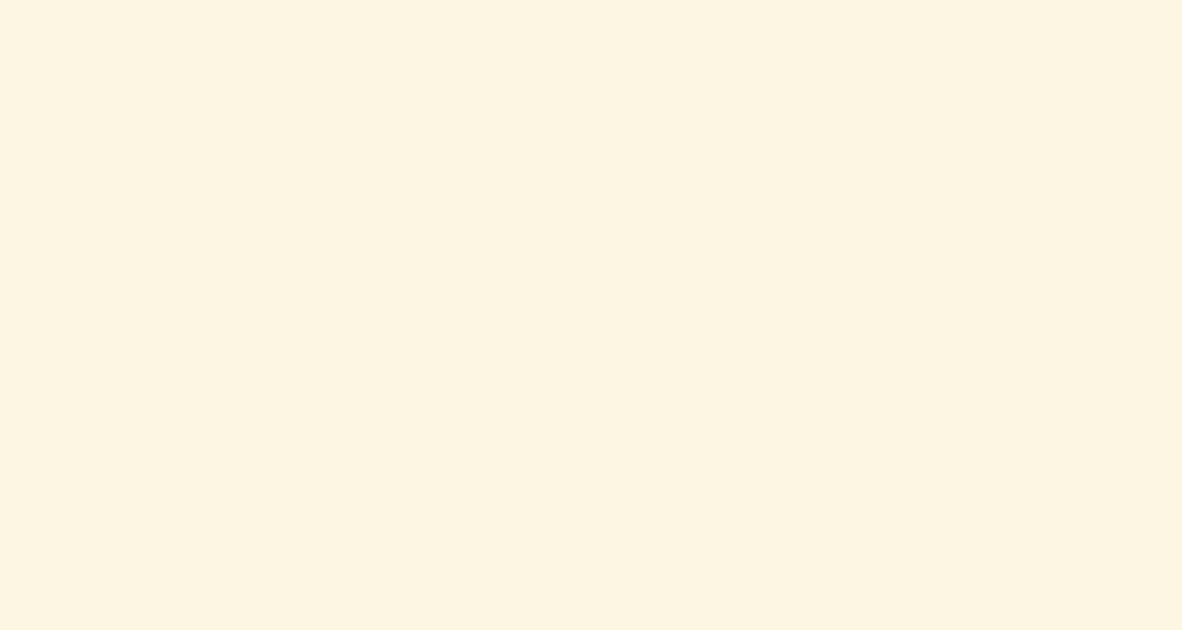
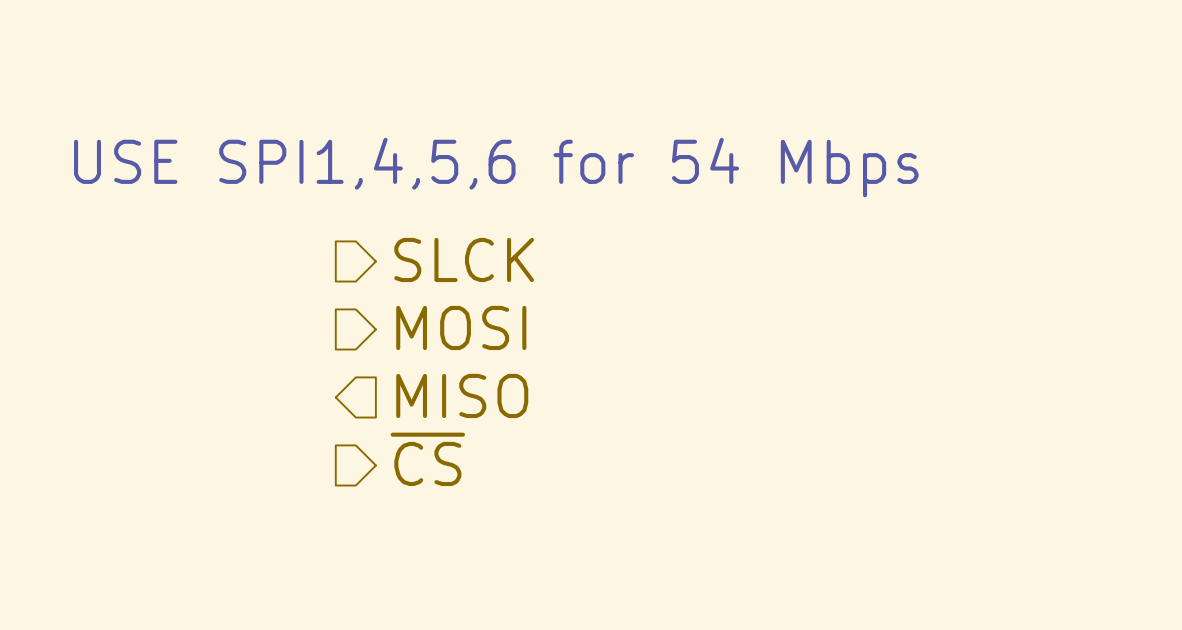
text: none -> USE SPI1,4,5,6 for 54 Mbps (496, 167)
hierarchical label: none -> SLCK (464, 259)
hierarchical label: none -> MOSI (461, 327)
hierarchical label: none -> MISO (462, 395)
hierarchical label: none -> ~{CS} (427, 459)

